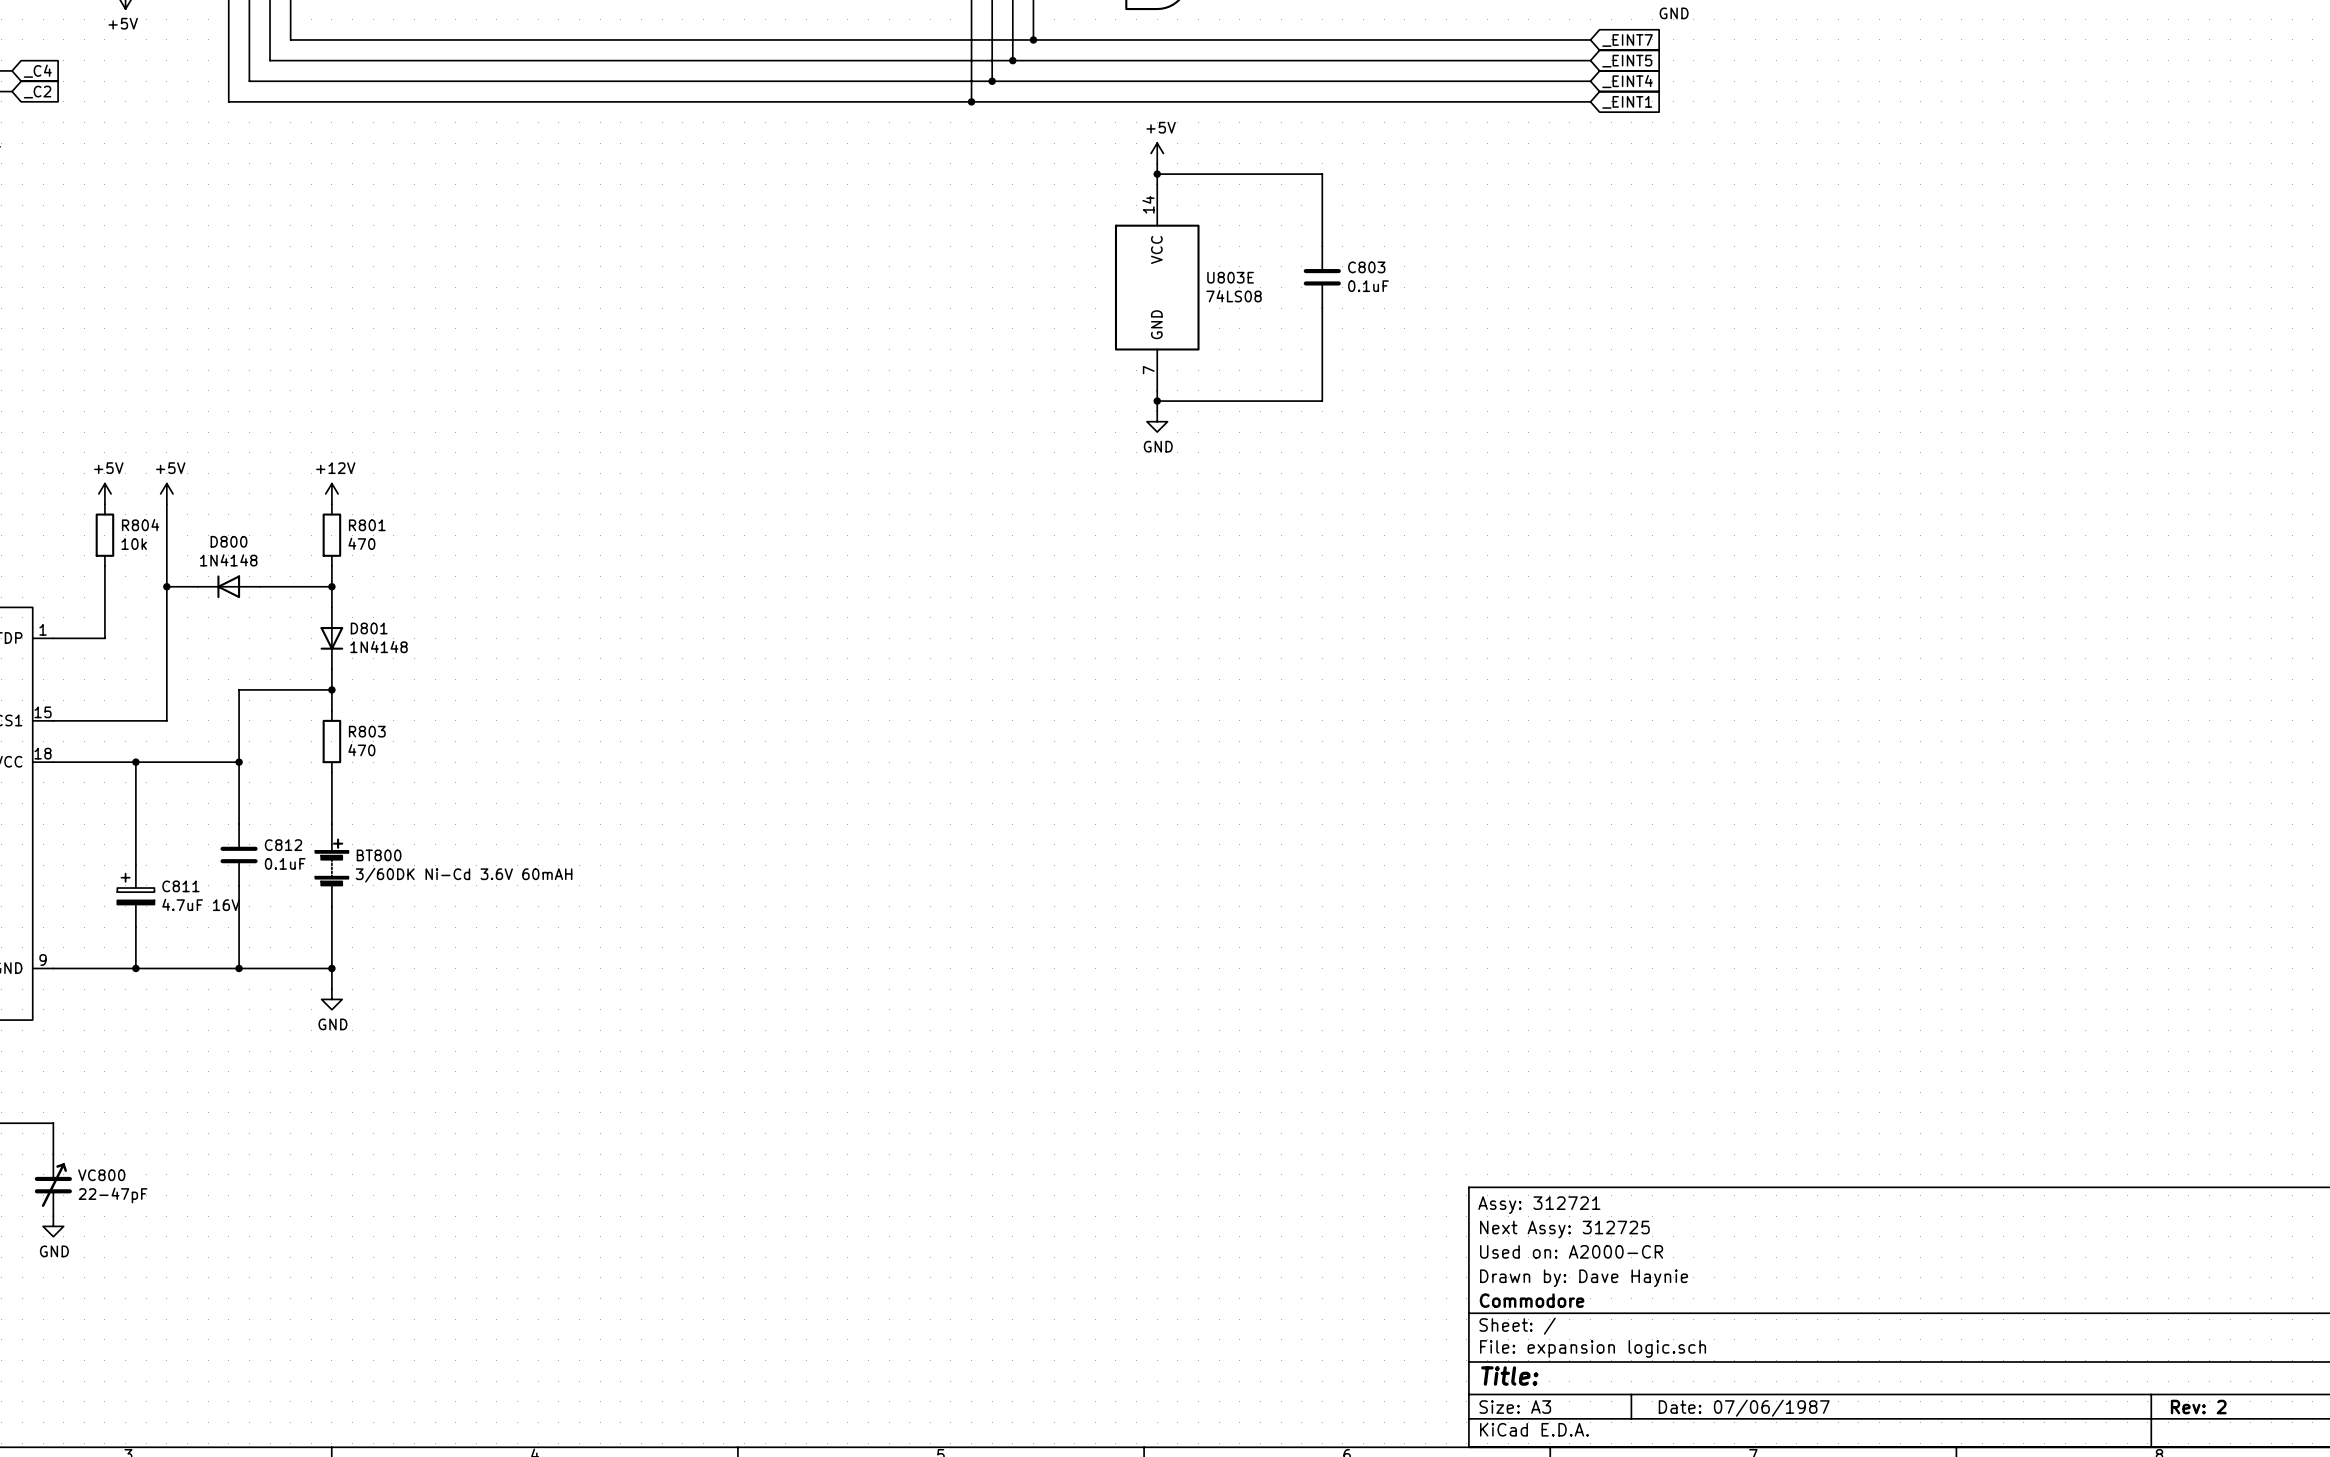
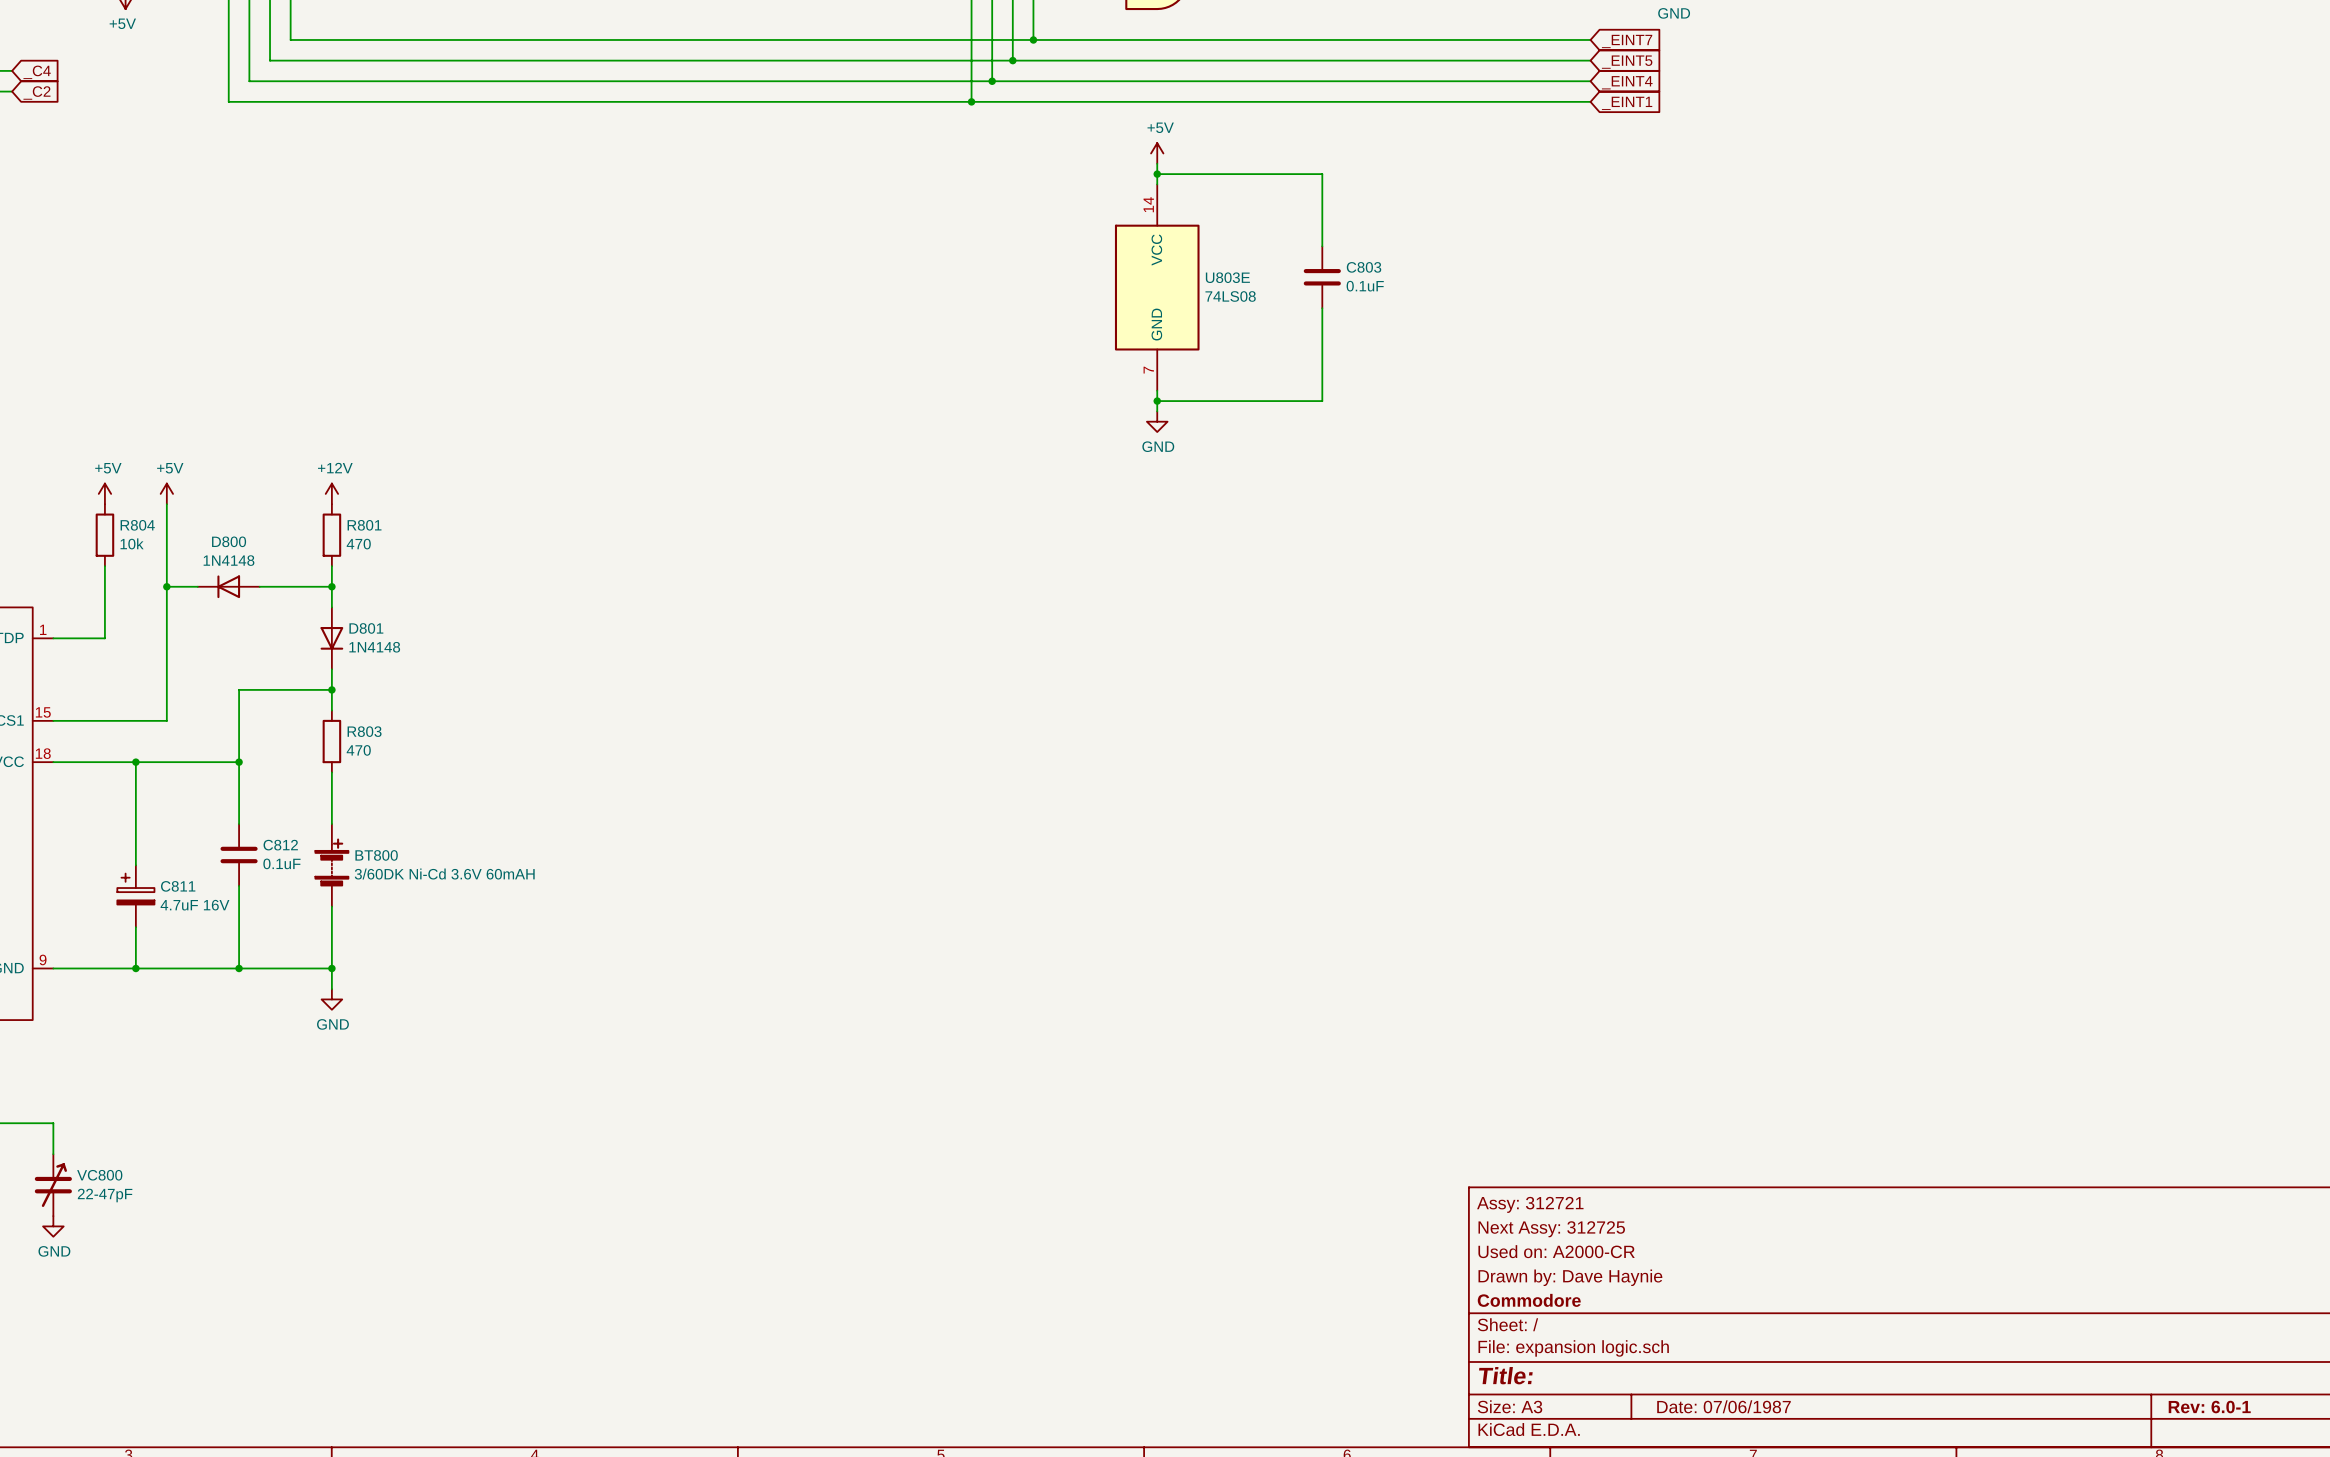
title block: Rev: 2 (2198, 1407) -> Rev: 6.0-1 (2209, 1407)

